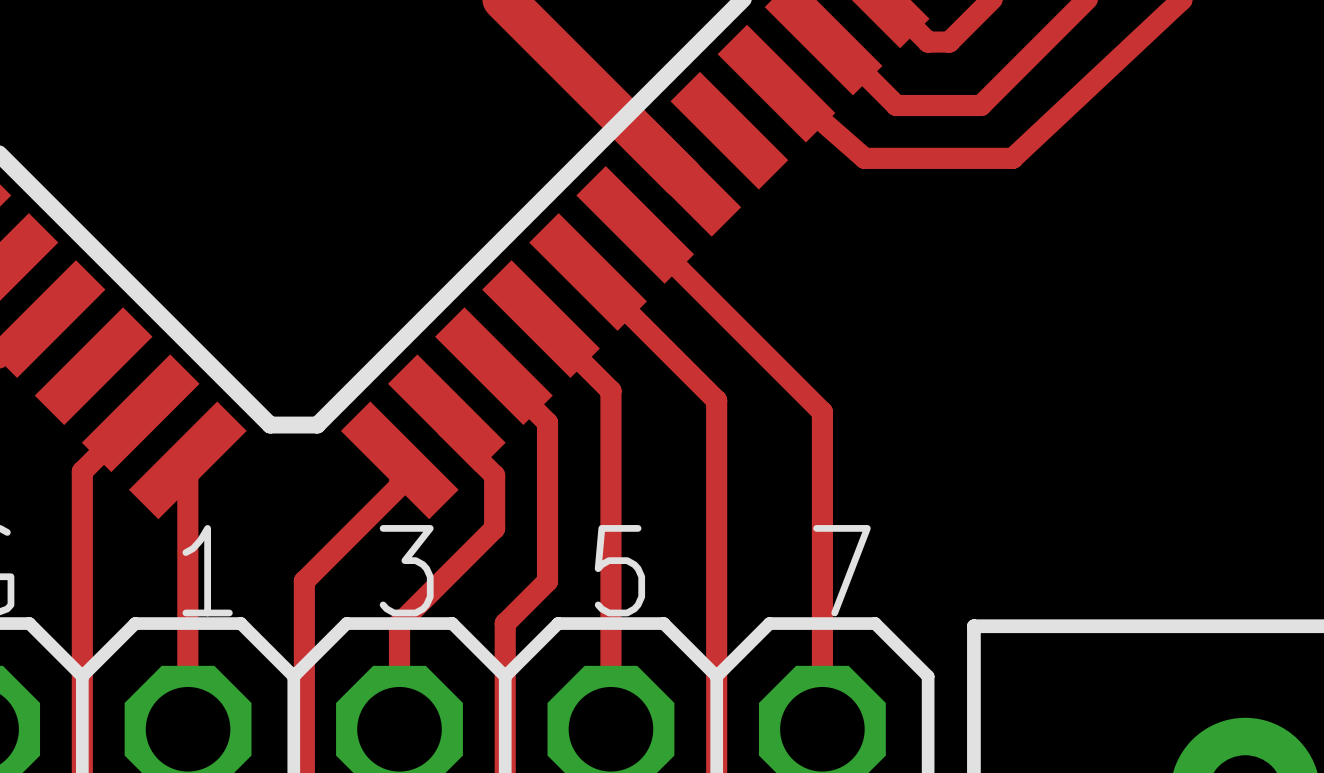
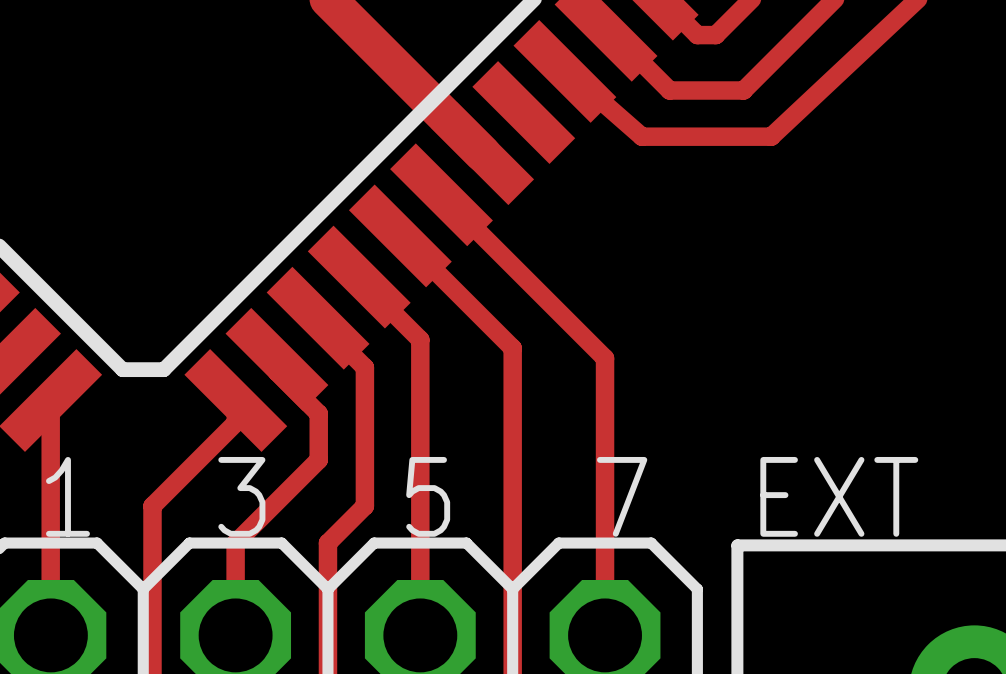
text: none -> EXT (839, 496)

